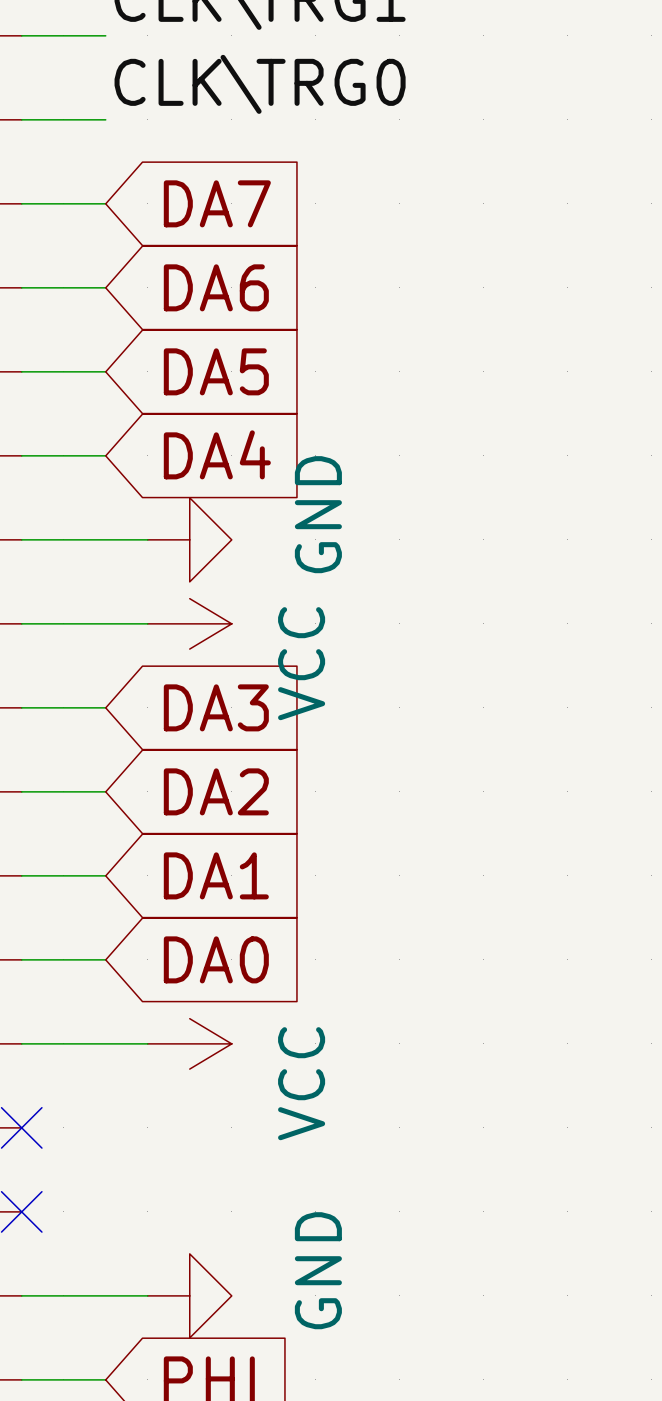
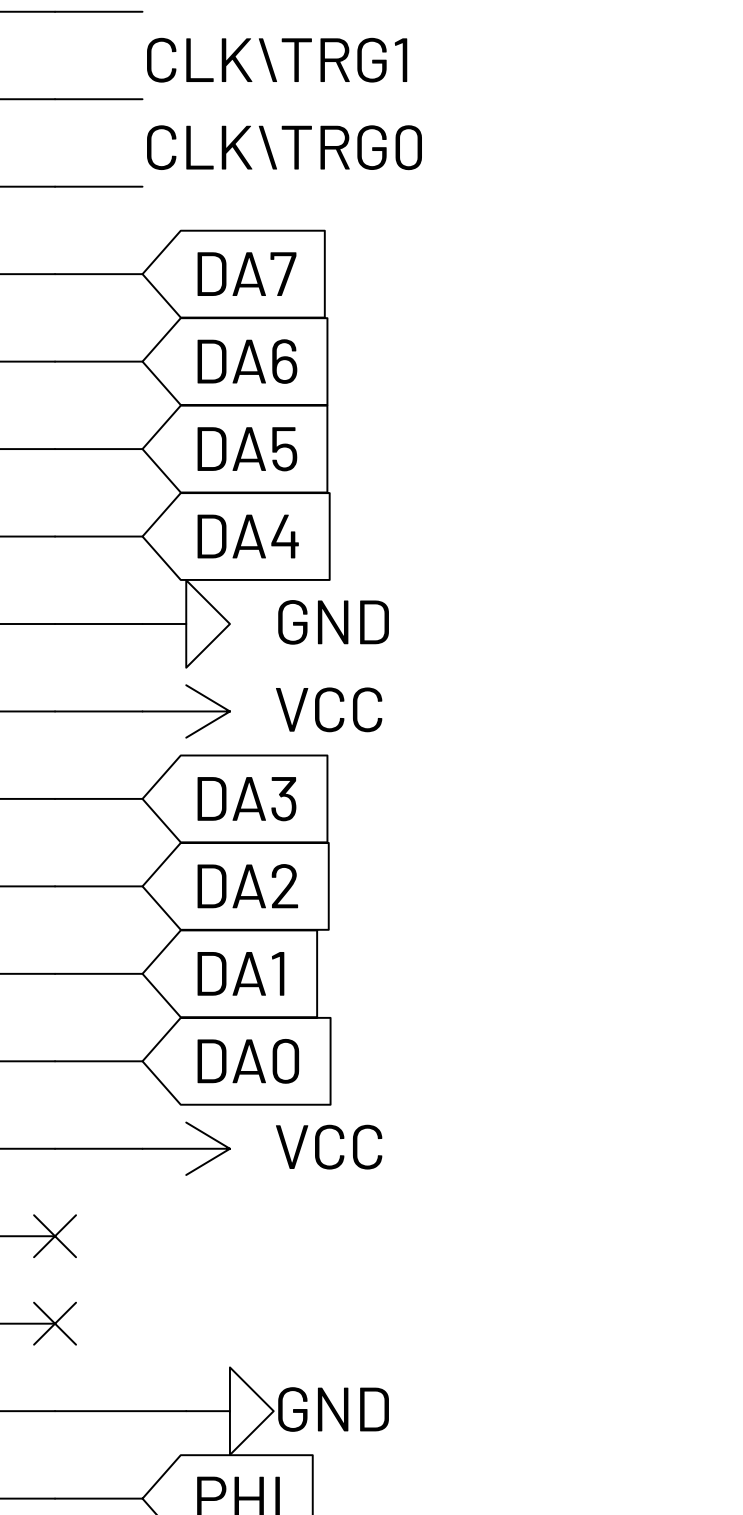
power symbol text rotation: 0° (318, 514) -> 90° clockwise (333, 622)
power symbol position: GND (189, 539) -> GND (186, 624)
power symbol position: VCC (189, 623) -> VCC (186, 711)
power symbol text rotation: 0° (301, 663) -> 90° clockwise (329, 709)
power symbol position: VCC (189, 1043) -> VCC (186, 1148)
power symbol text rotation: 0° (301, 1083) -> 90° clockwise (329, 1147)
power symbol text rotation: 0° (318, 1270) -> 90° clockwise (333, 1409)

